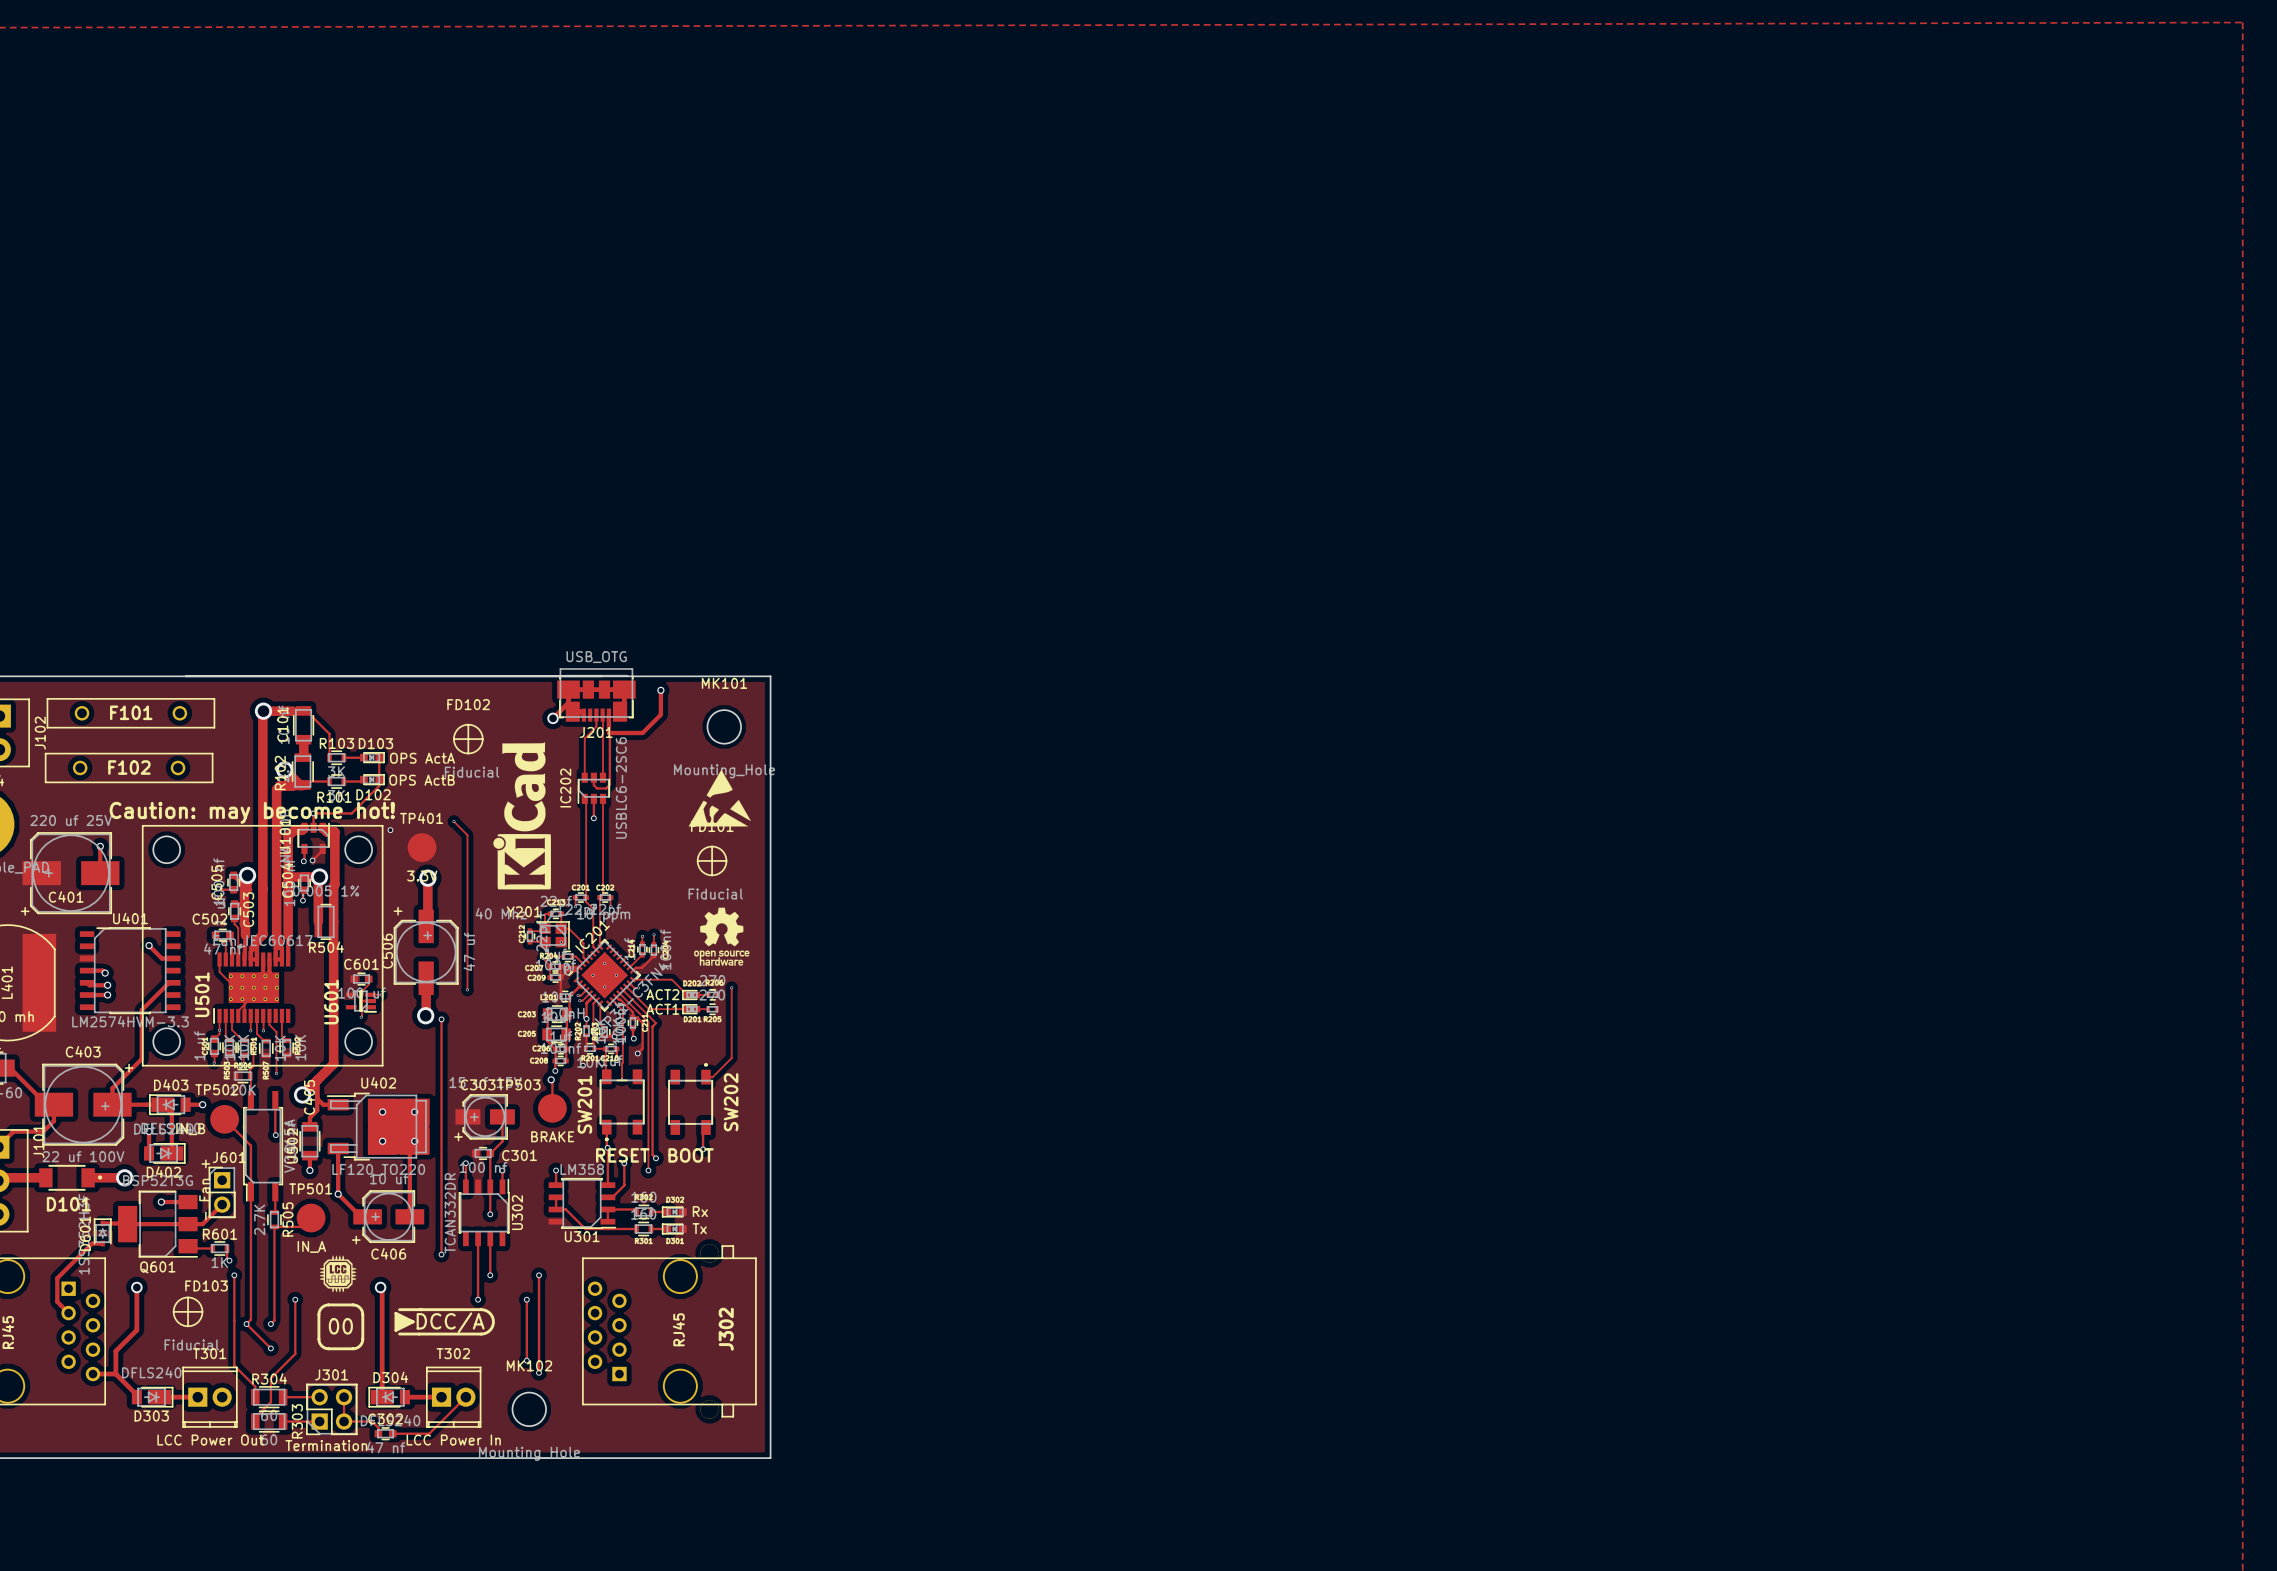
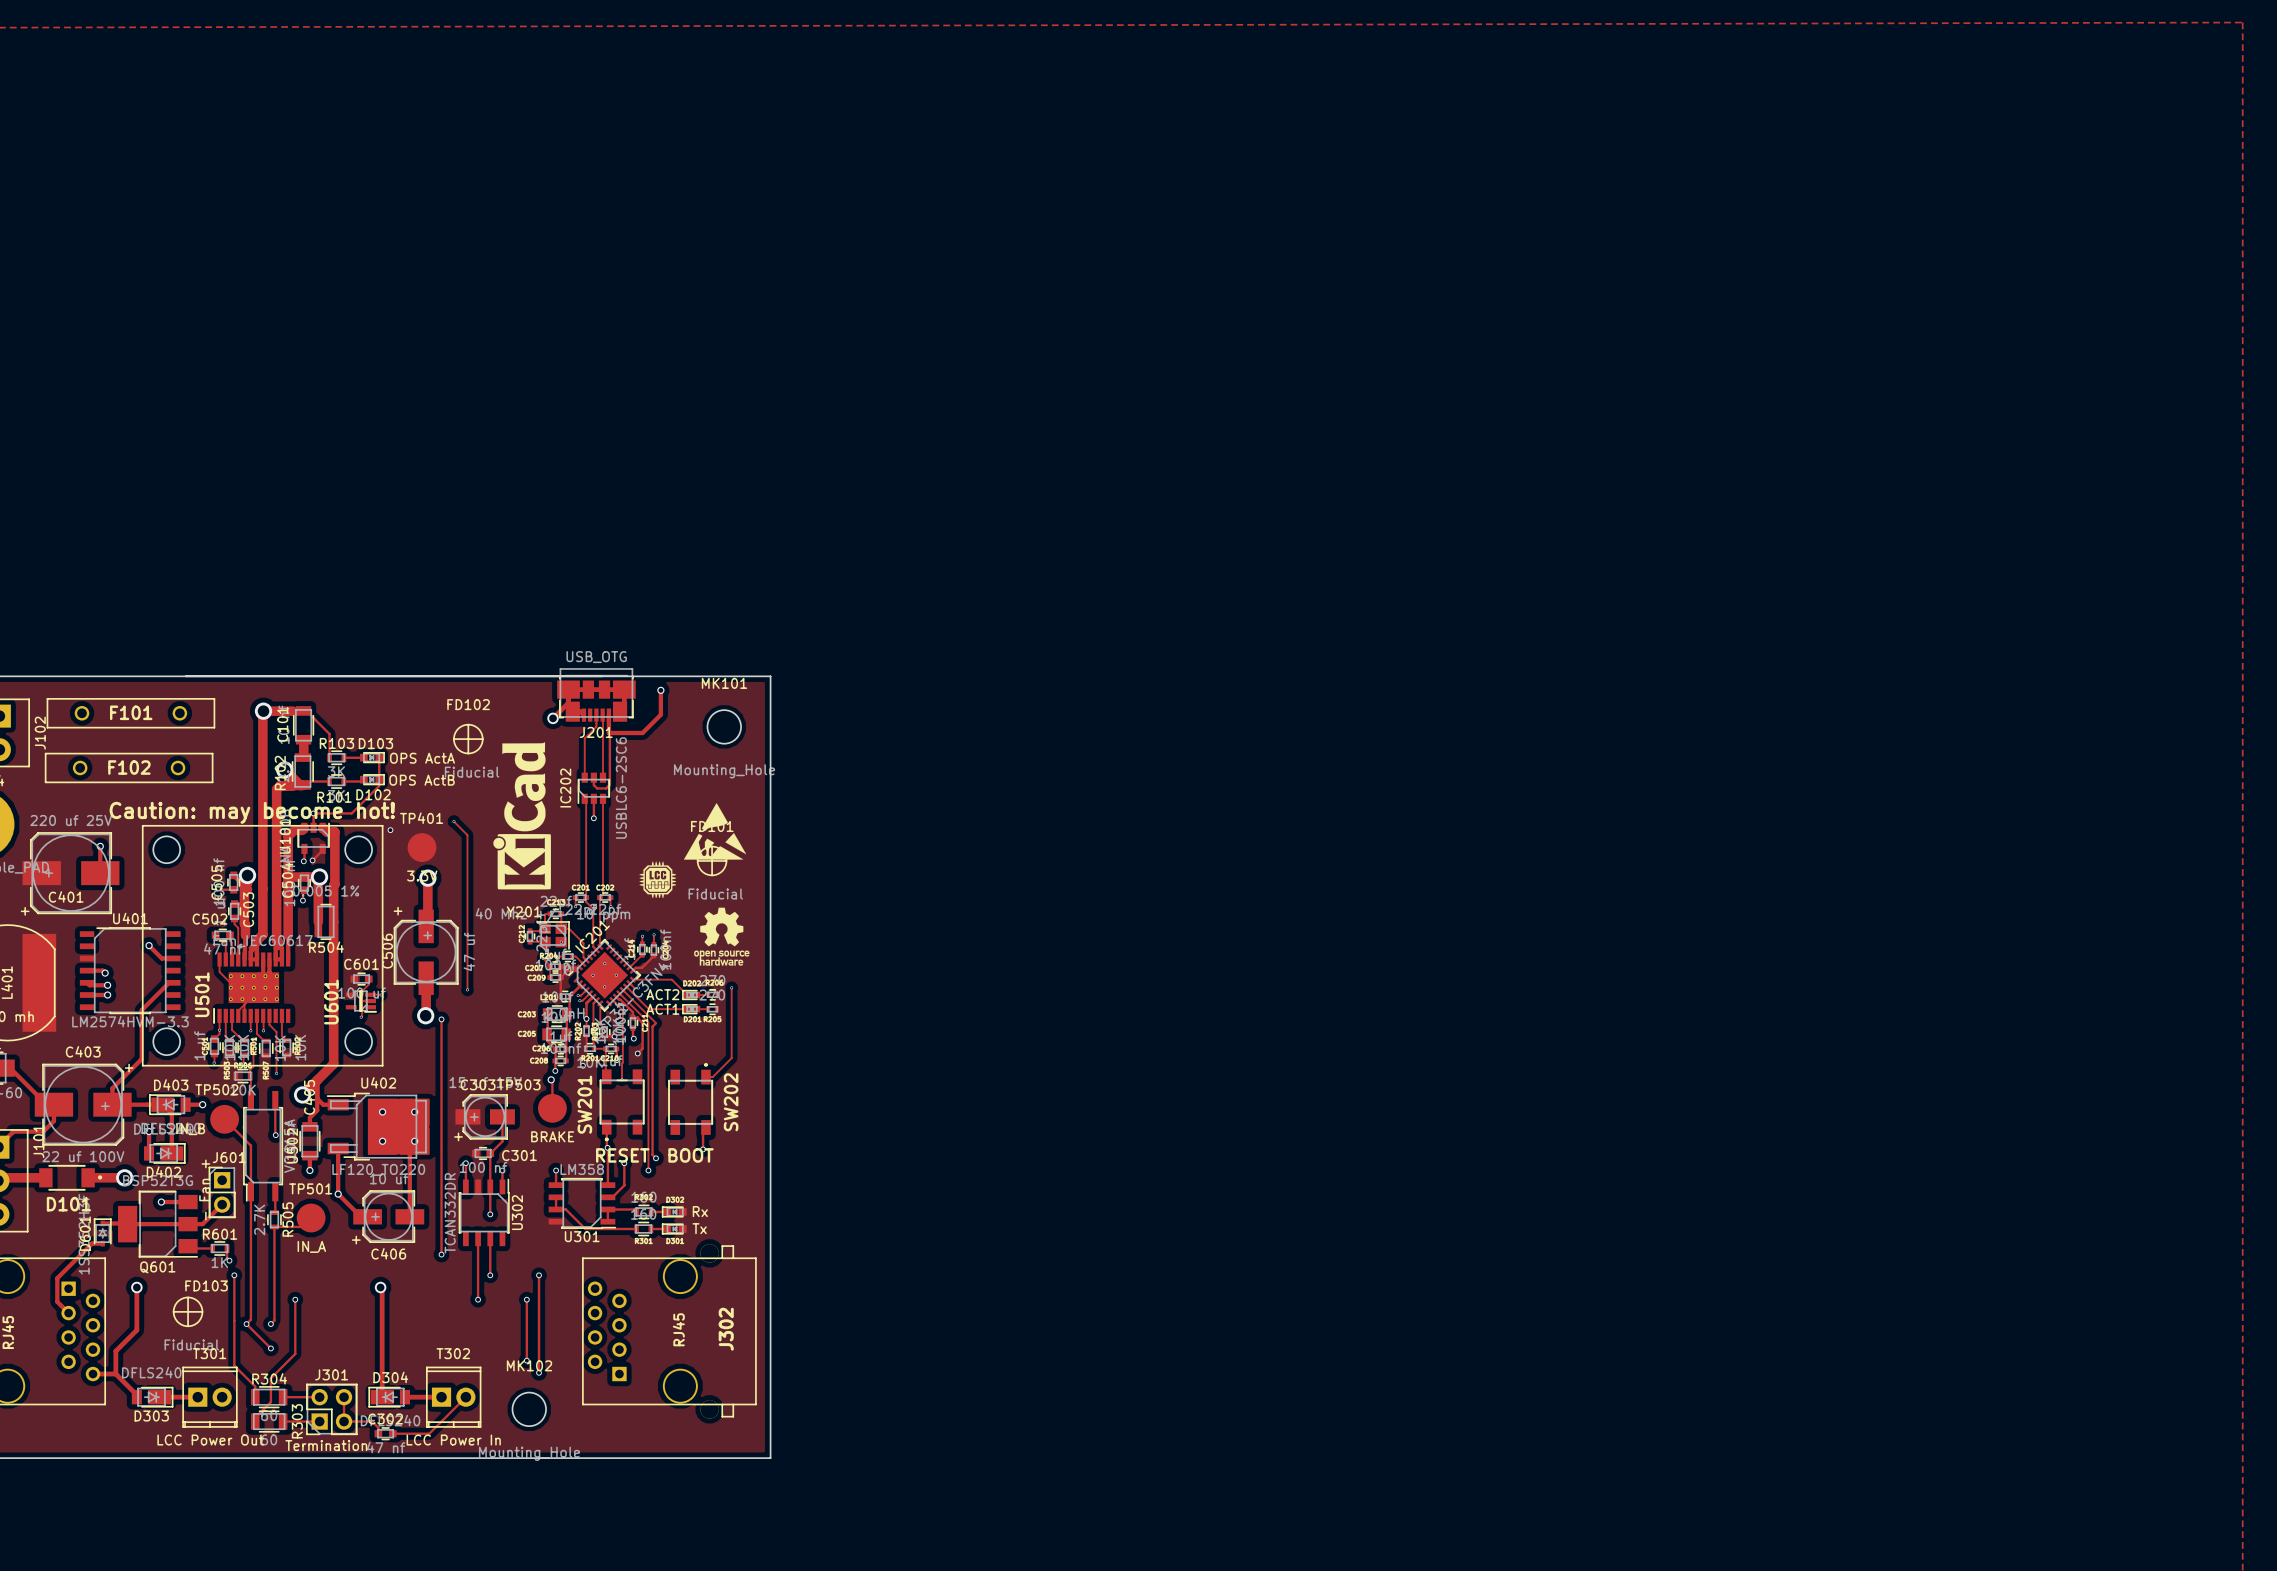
drawing position: (719, 798) -> (715, 831)
drawing: none -> [639, 861, 677, 898]
drawing: [317, 1255, 365, 1351] -> none
drawing: [394, 1308, 495, 1336] -> none

